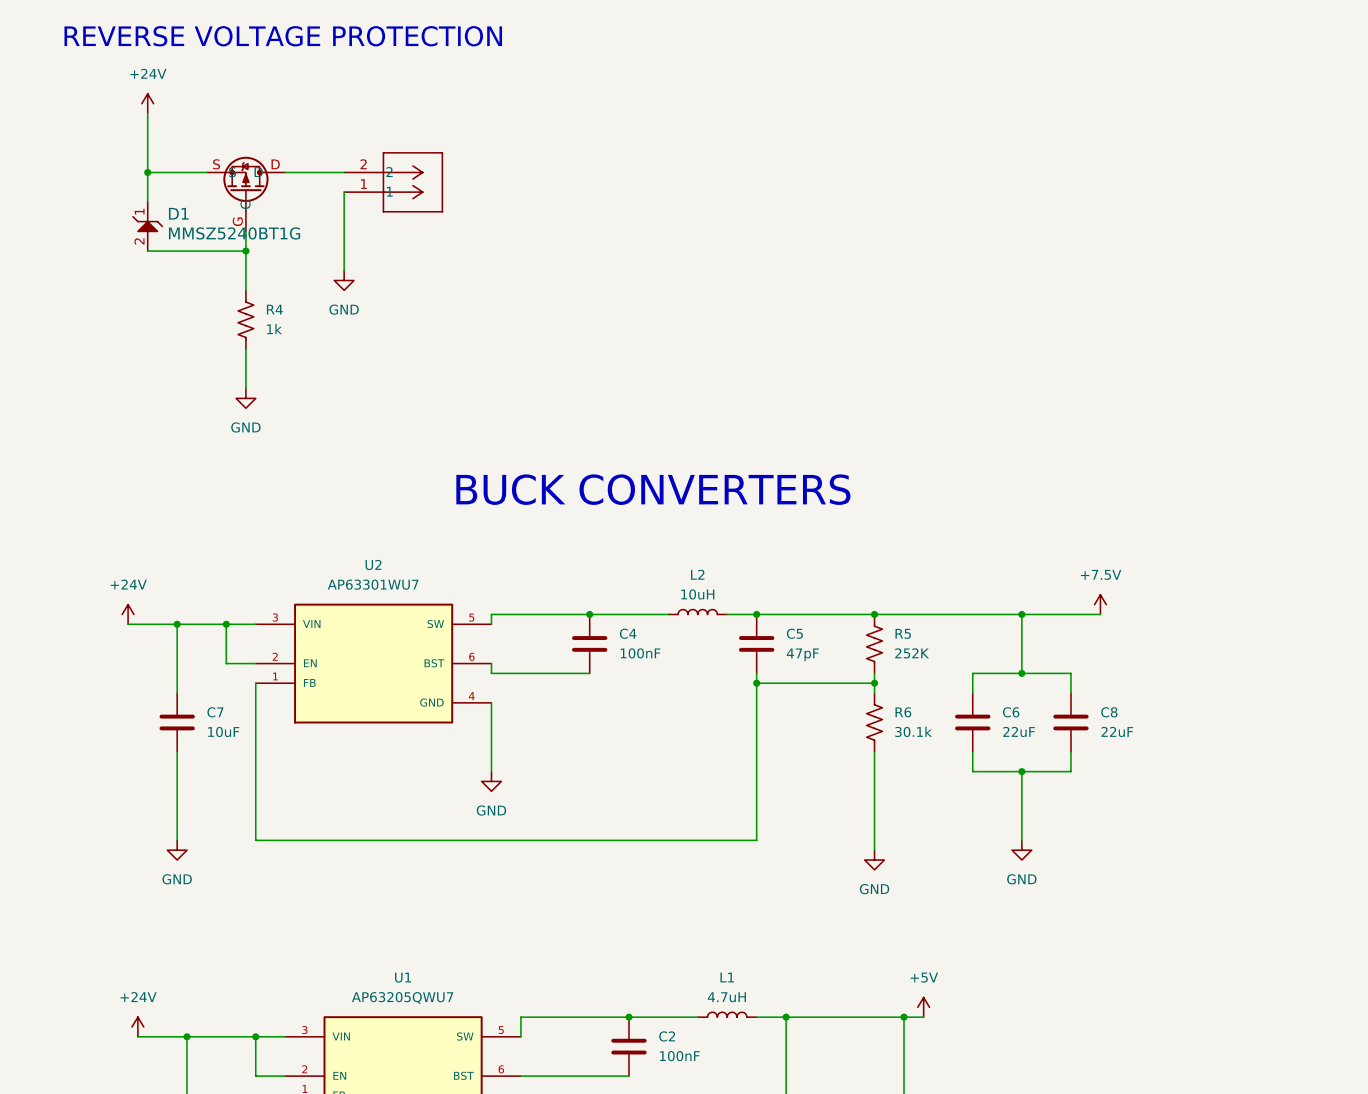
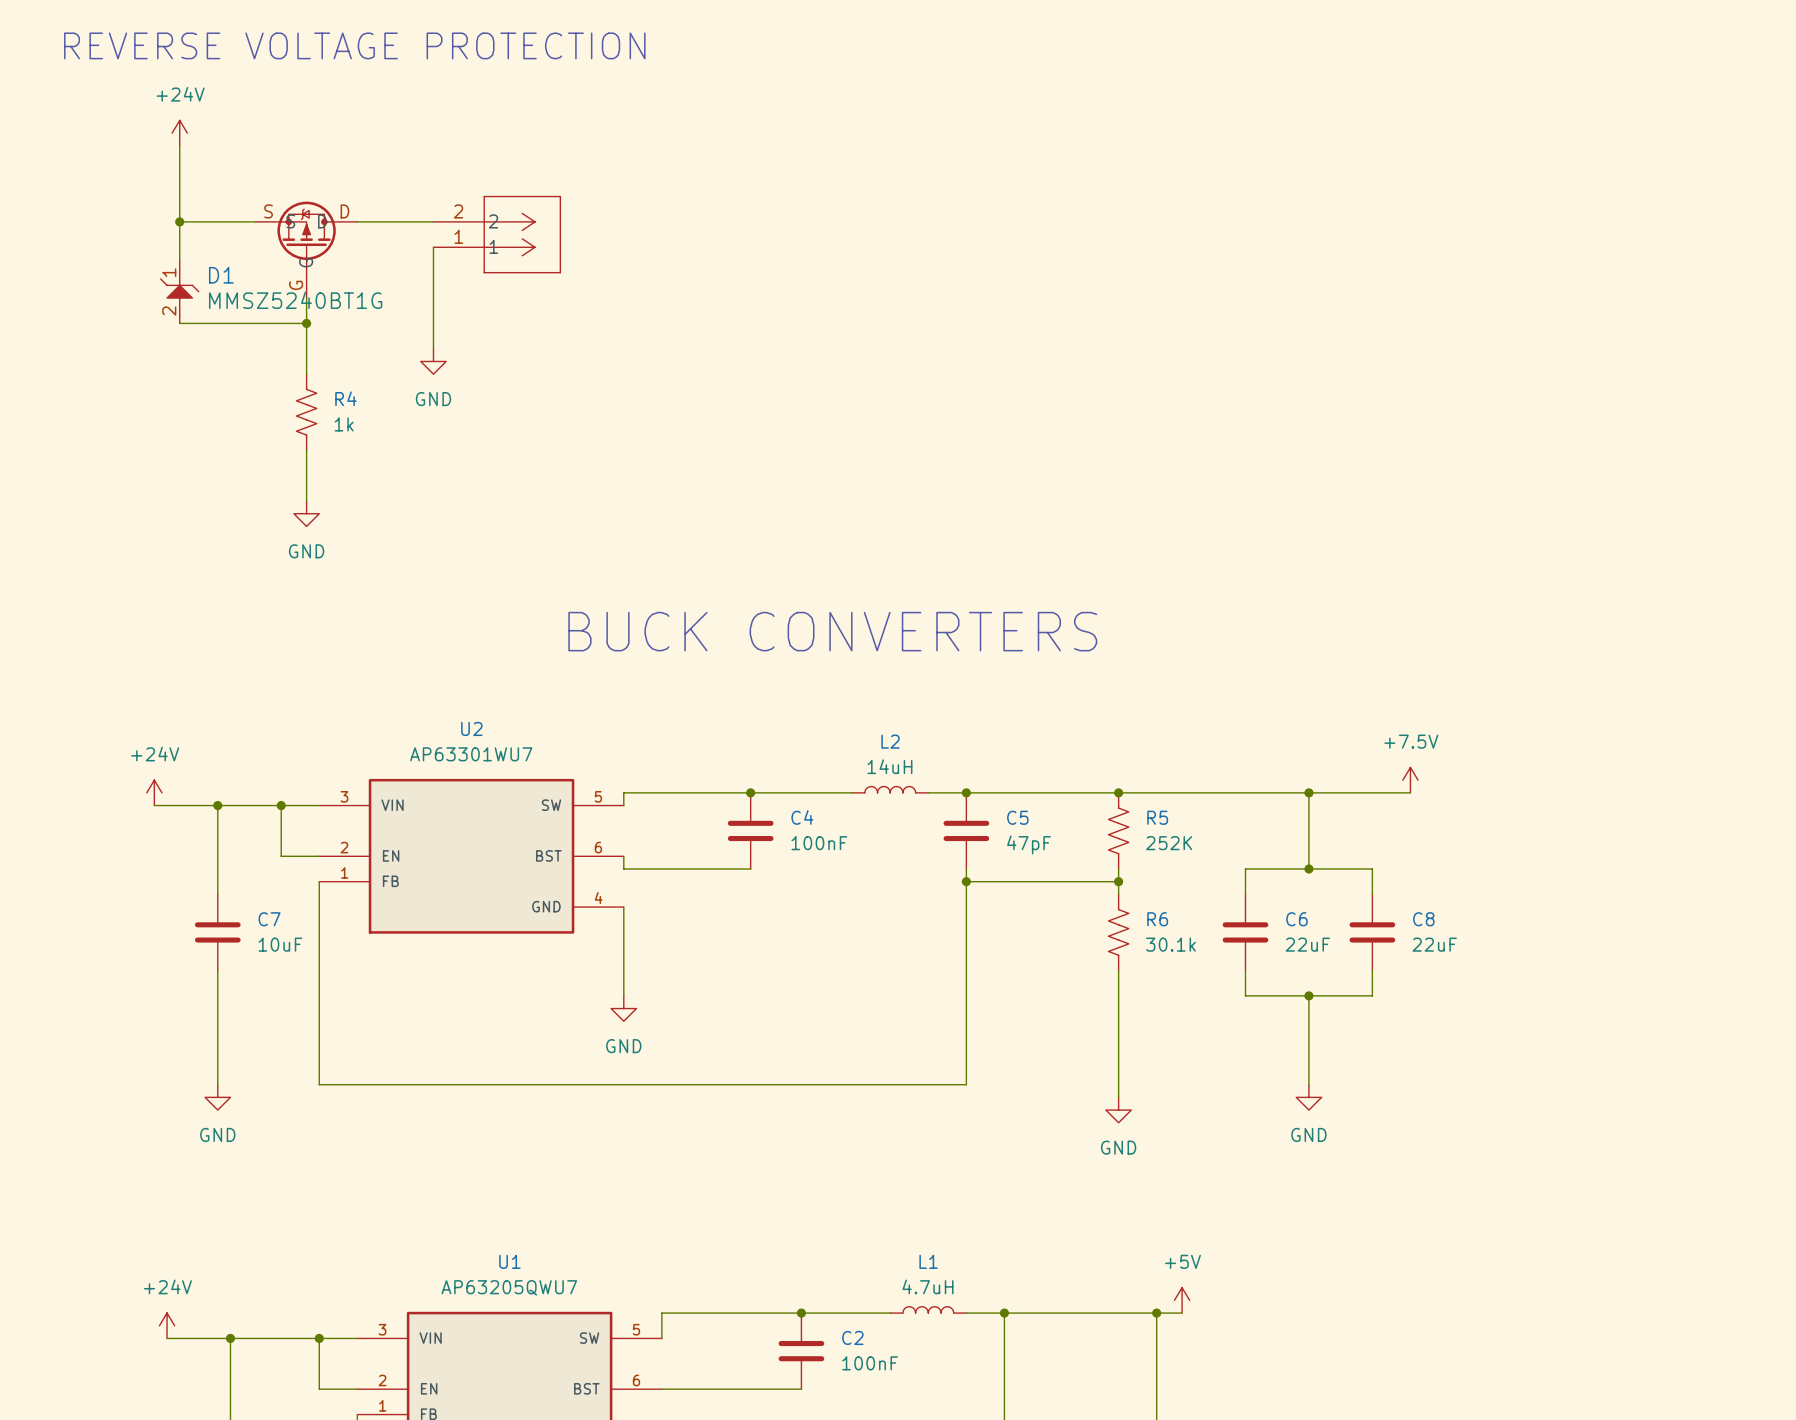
L2 value: 10uH (697, 594) -> 14uH (889, 766)

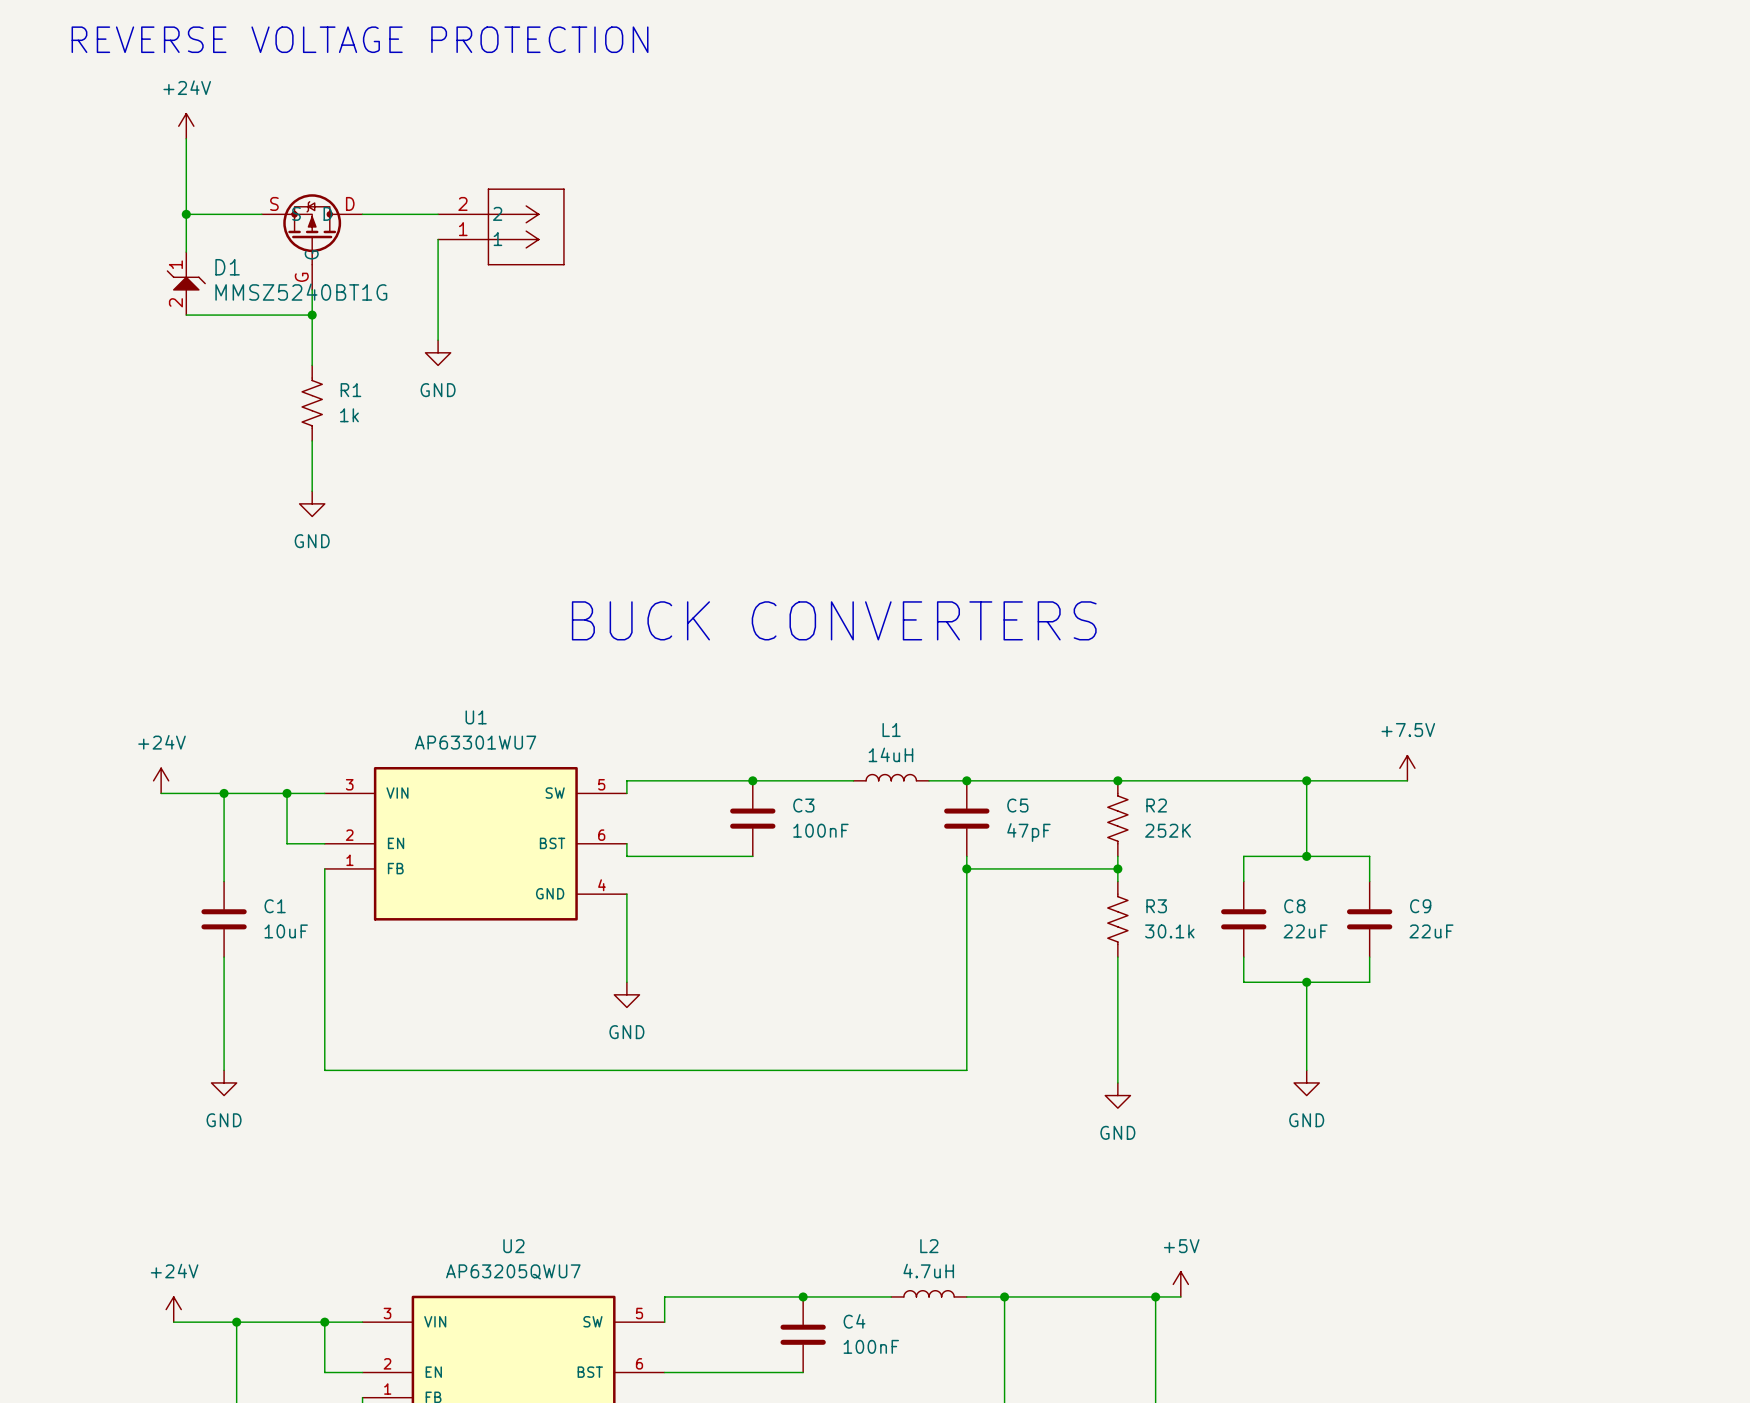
R4 name: R4 (345, 398) -> R1 (350, 390)
U2 name: U2 (471, 728) -> U1 (476, 717)
L2 name: L2 (890, 741) -> L1 (891, 730)
C4 name: C4 (802, 817) -> C3 (803, 805)
R5 name: R5 (1157, 817) -> R2 (1156, 805)
C7 name: C7 (269, 919) -> C1 (275, 906)
R6 name: R6 (1157, 919) -> R3 (1156, 906)
C6 name: C6 (1296, 919) -> C8 (1294, 906)
C8 name: C8 (1423, 919) -> C9 (1420, 906)
U1 name: U1 (509, 1261) -> U2 (513, 1246)
L1 name: L1 (928, 1261) -> L2 (929, 1246)
C2 name: C2 (852, 1337) -> C4 (854, 1321)

